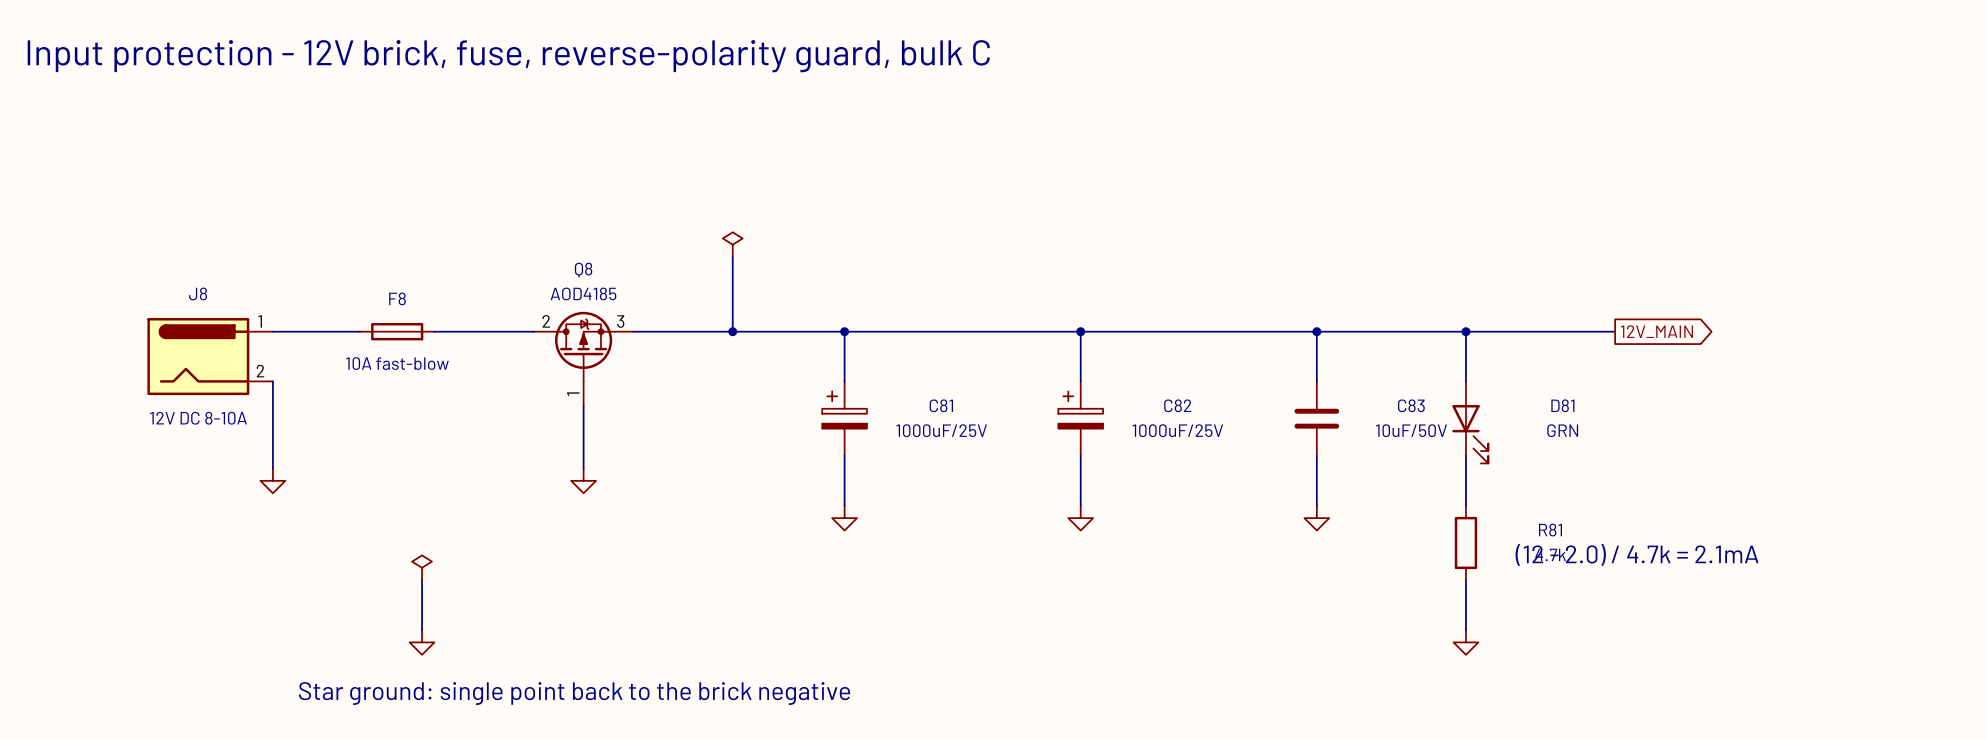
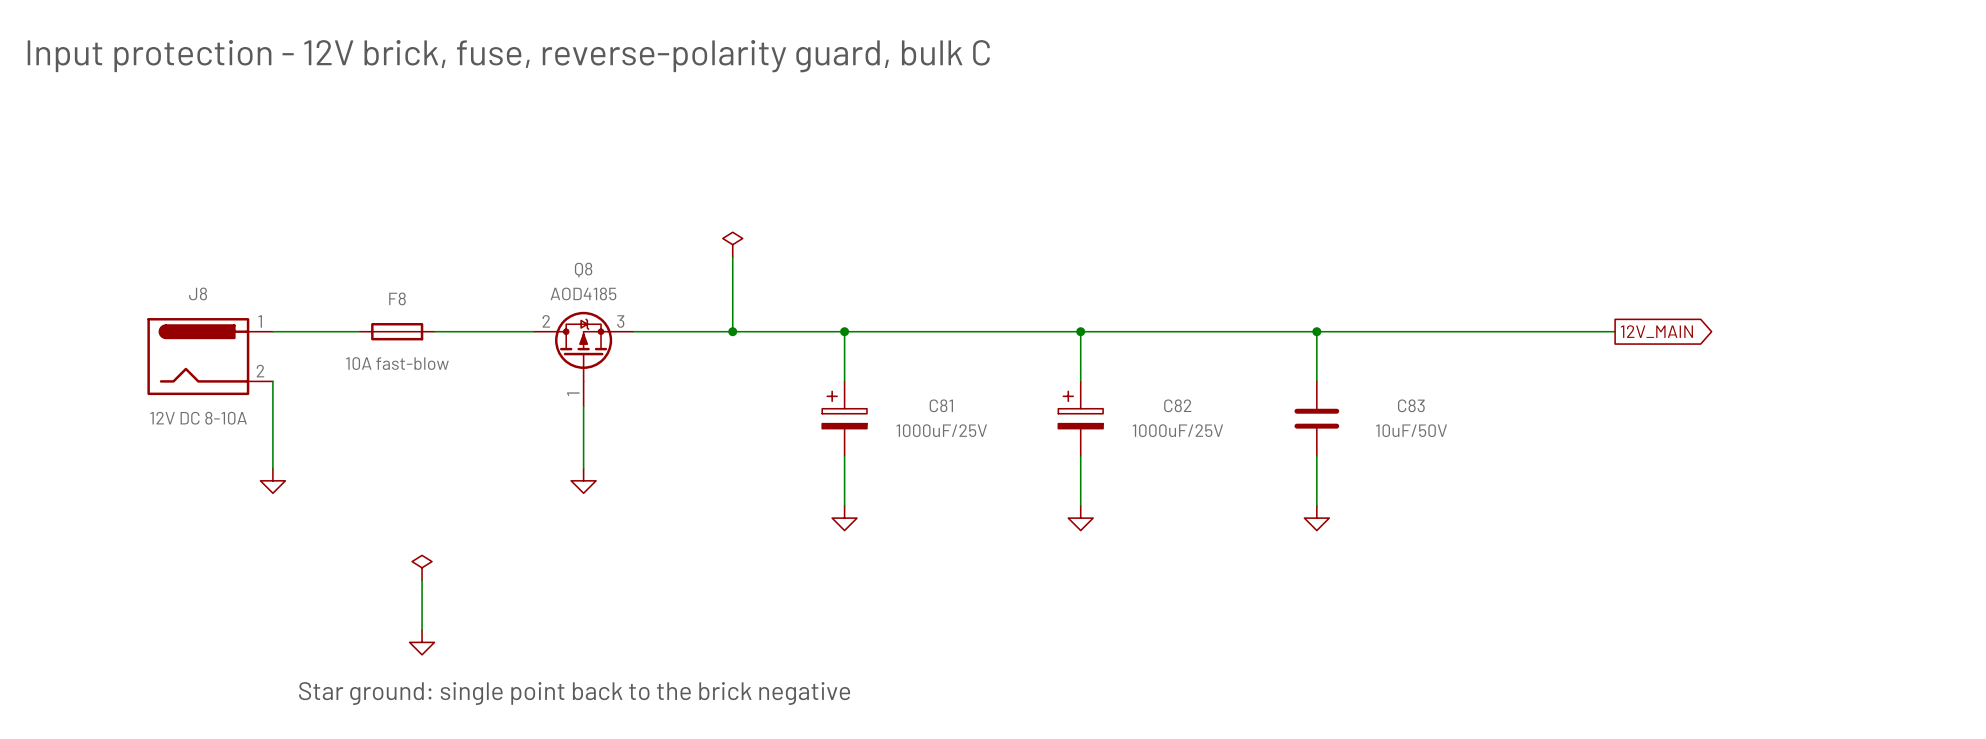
wire: (1465, 331) (1465, 381) -> none
junction: (1465, 331) -> none
D81: GRN (1470, 422) -> none
wire: (1465, 455) (1465, 505) -> none
R81: 4.7k (1465, 542) -> none
text: (12 - 2.0) / 4.7k = 2.1mA (1636, 554) -> none
wire: (1465, 580) (1465, 629) -> none
power symbol: (1465, 642) -> none

